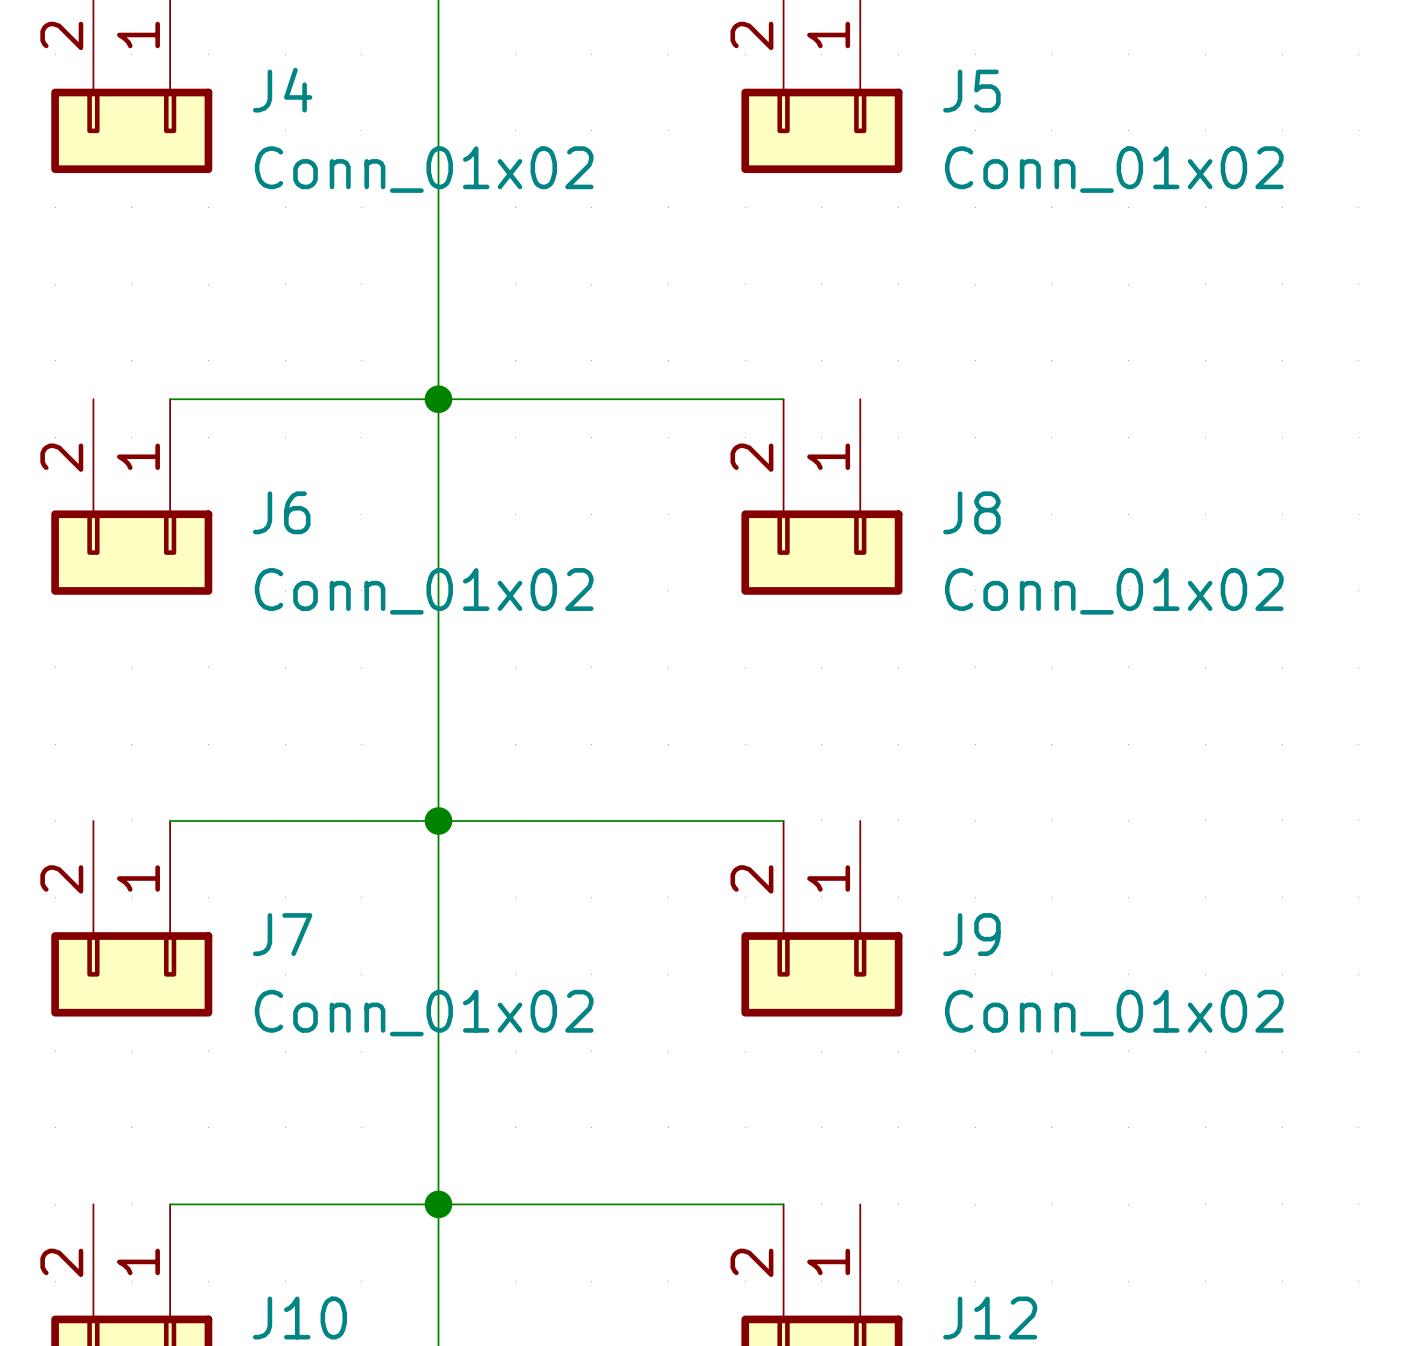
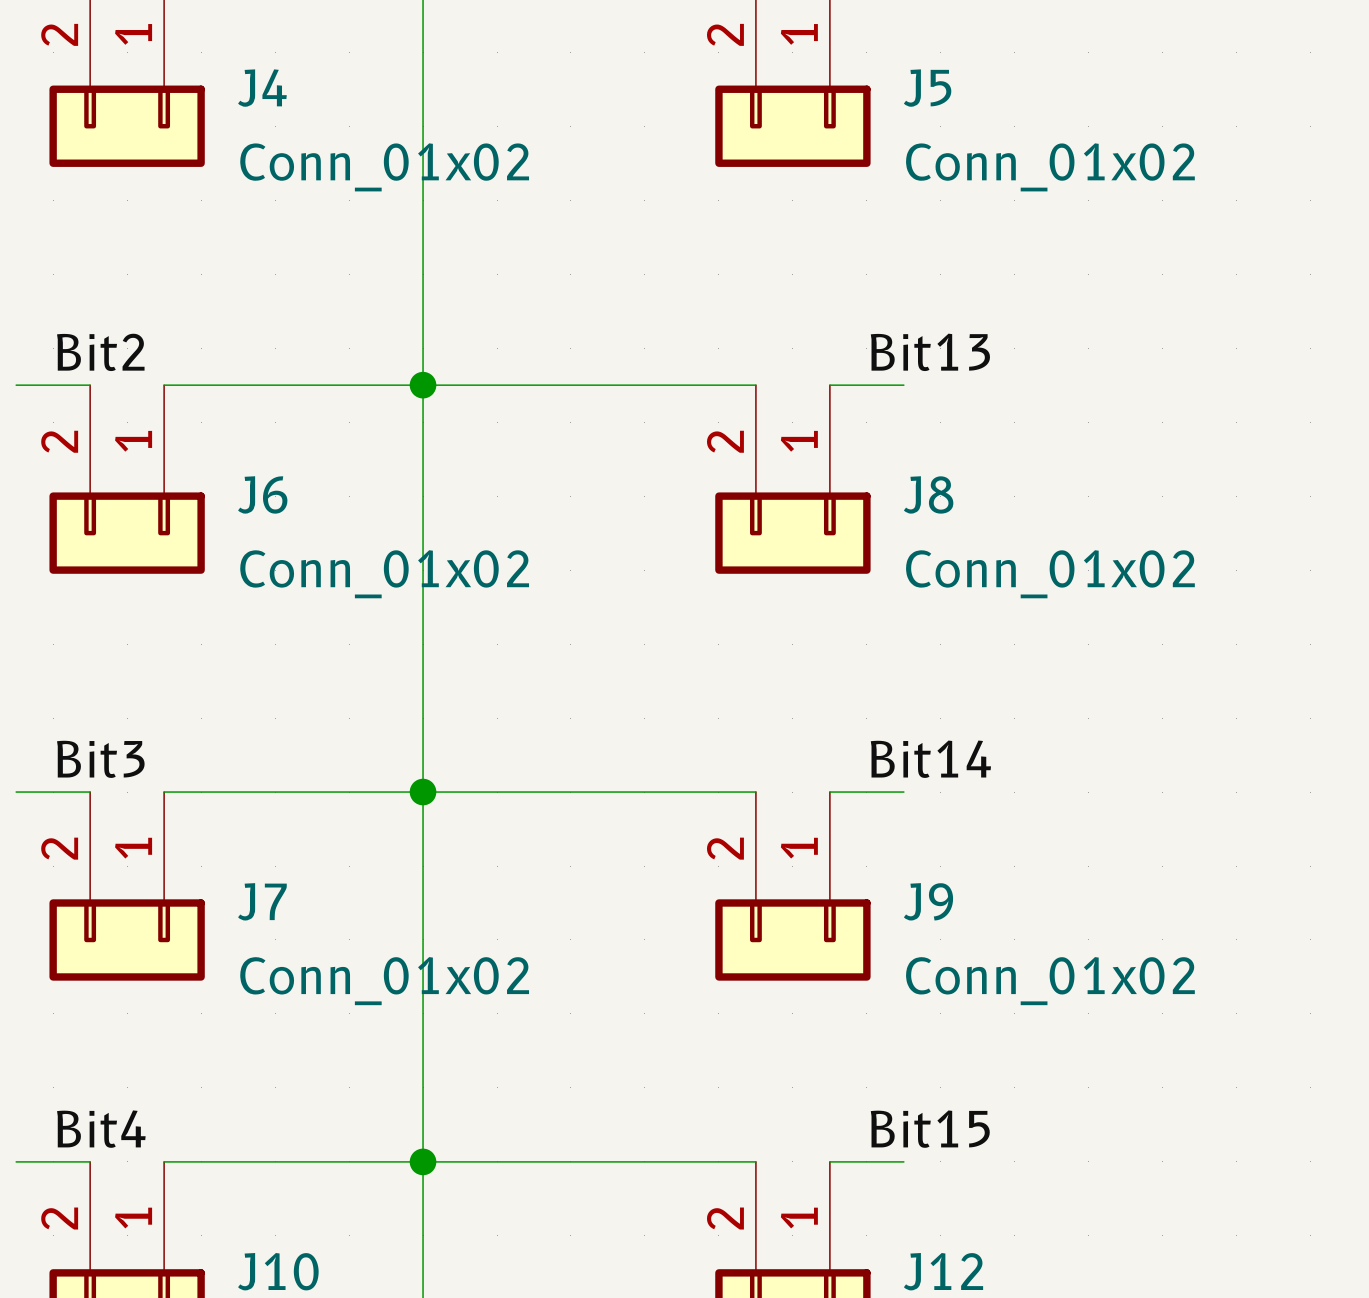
label: none -> Bit2 (100, 352)
label: none -> Bit13 (930, 352)
wire: none -> (16, 385) (90, 385)
wire: none -> (829, 385) (903, 385)
label: none -> Bit14 (930, 759)
label: none -> Bit3 (100, 759)
wire: none -> (16, 792) (90, 792)
wire: none -> (829, 792) (903, 792)
label: none -> Bit4 (101, 1129)
label: none -> Bit15 (930, 1129)
wire: none -> (16, 1161) (90, 1161)
wire: none -> (829, 1161) (903, 1161)

